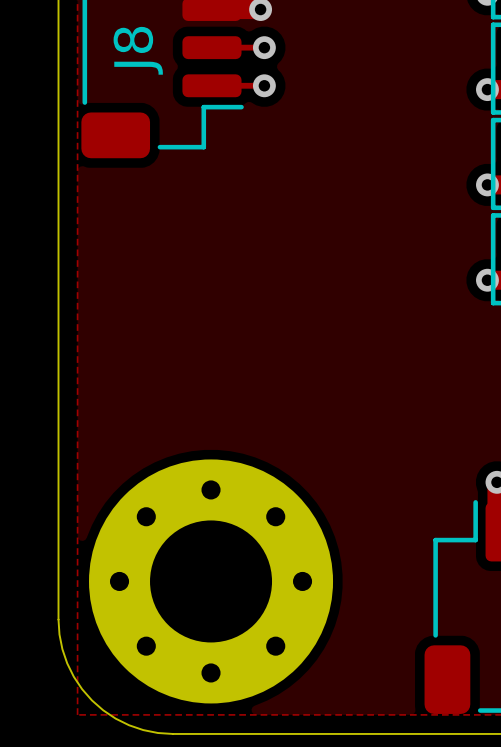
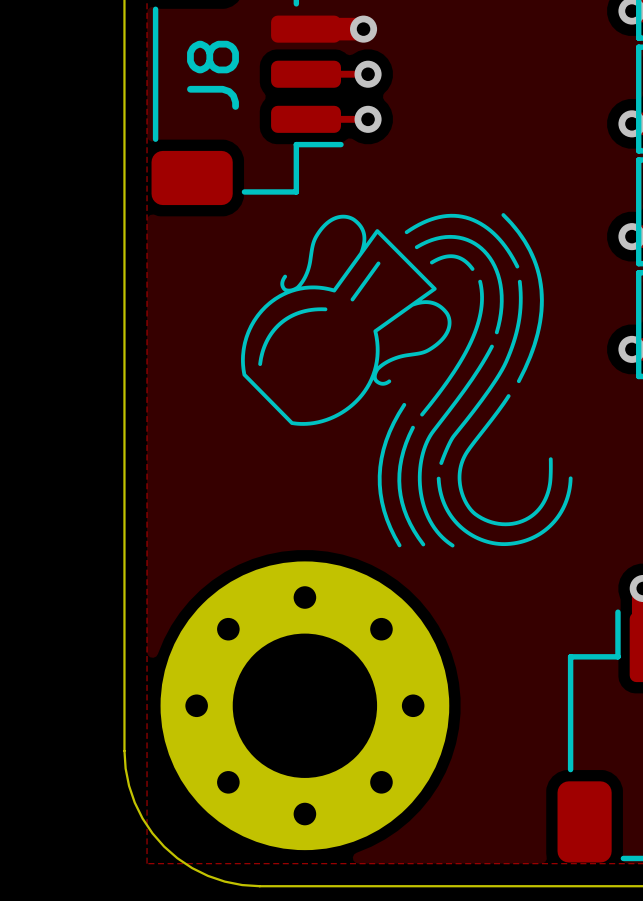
drawing: none -> [241, 213, 573, 548]

